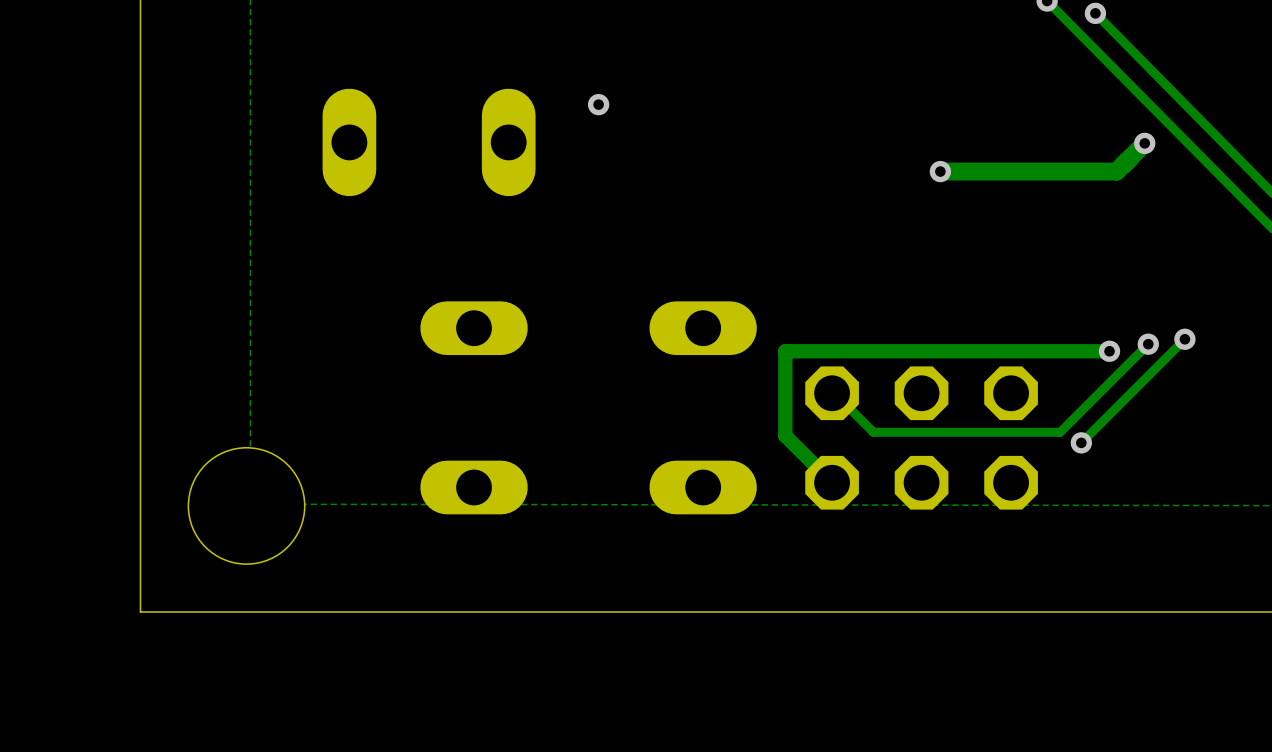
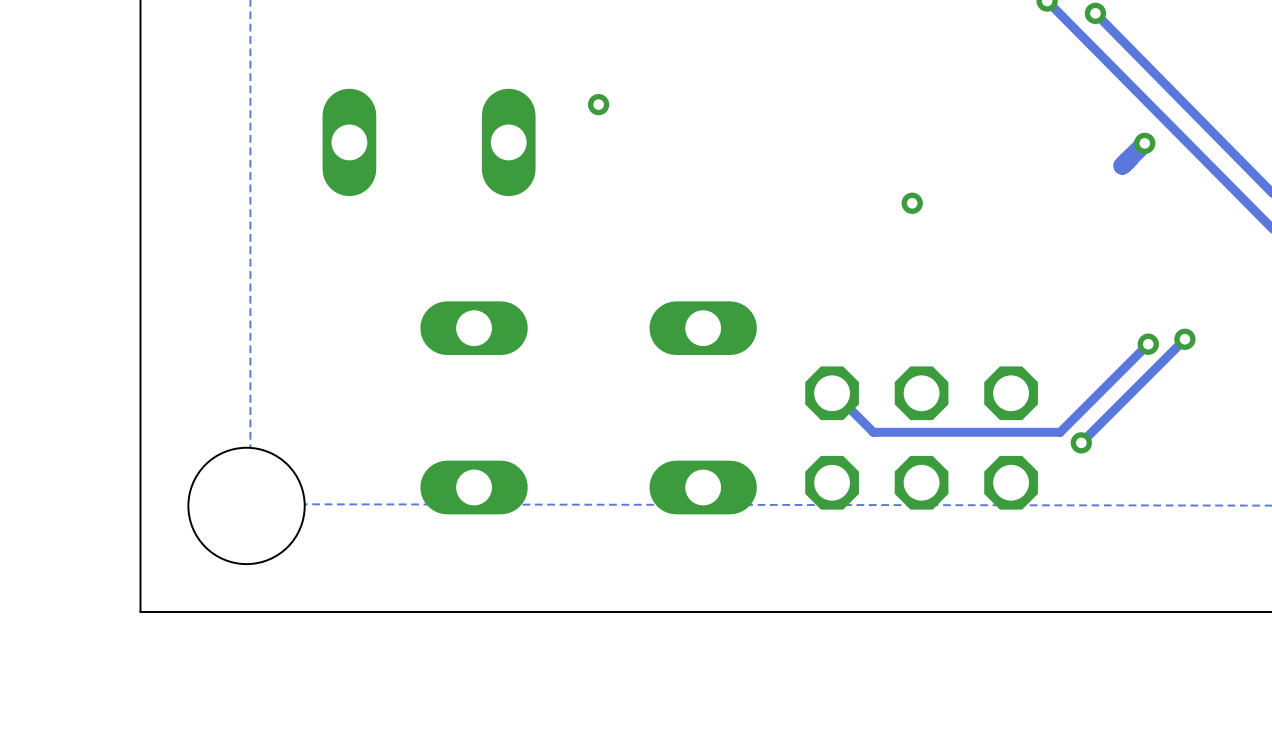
track: (1122, 165) (1116, 171) (940, 171) -> none
via position: (940, 171) -> (912, 203)
track: (1109, 351) (785, 351) (785, 435) (832, 482) -> none
via: (1109, 351) -> none

